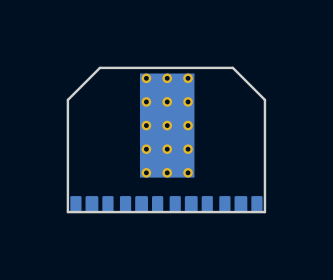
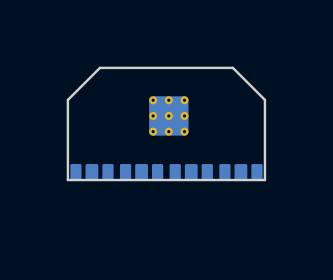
part footprint: [139, 73, 195, 178] -> [149, 96, 189, 136]
part: none -> (91, 172)
part: none -> (141, 172)
part: none -> (191, 172)
part: none -> (240, 172)
board edge: (264, 180) (264, 212) (67, 212) (67, 180) -> (264, 180) (67, 180)
part: (91, 204) -> none
part: (141, 204) -> none
part: (191, 204) -> none
part: (240, 204) -> none

